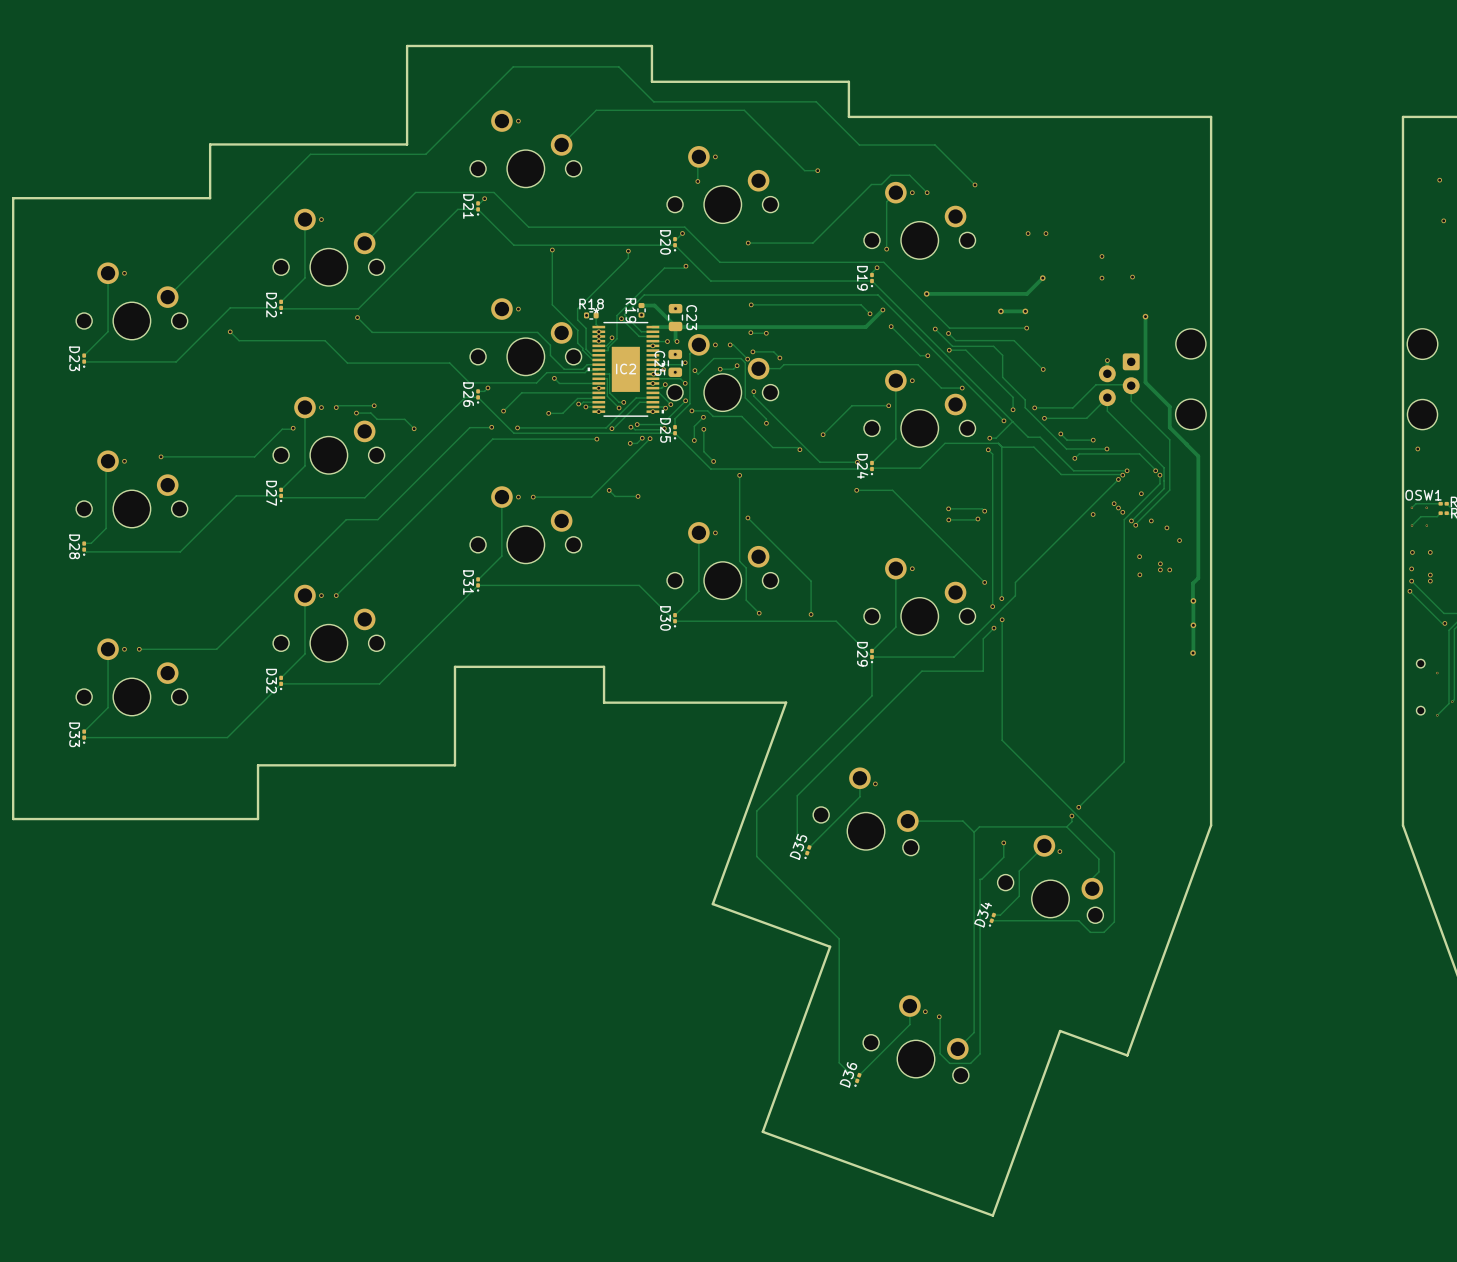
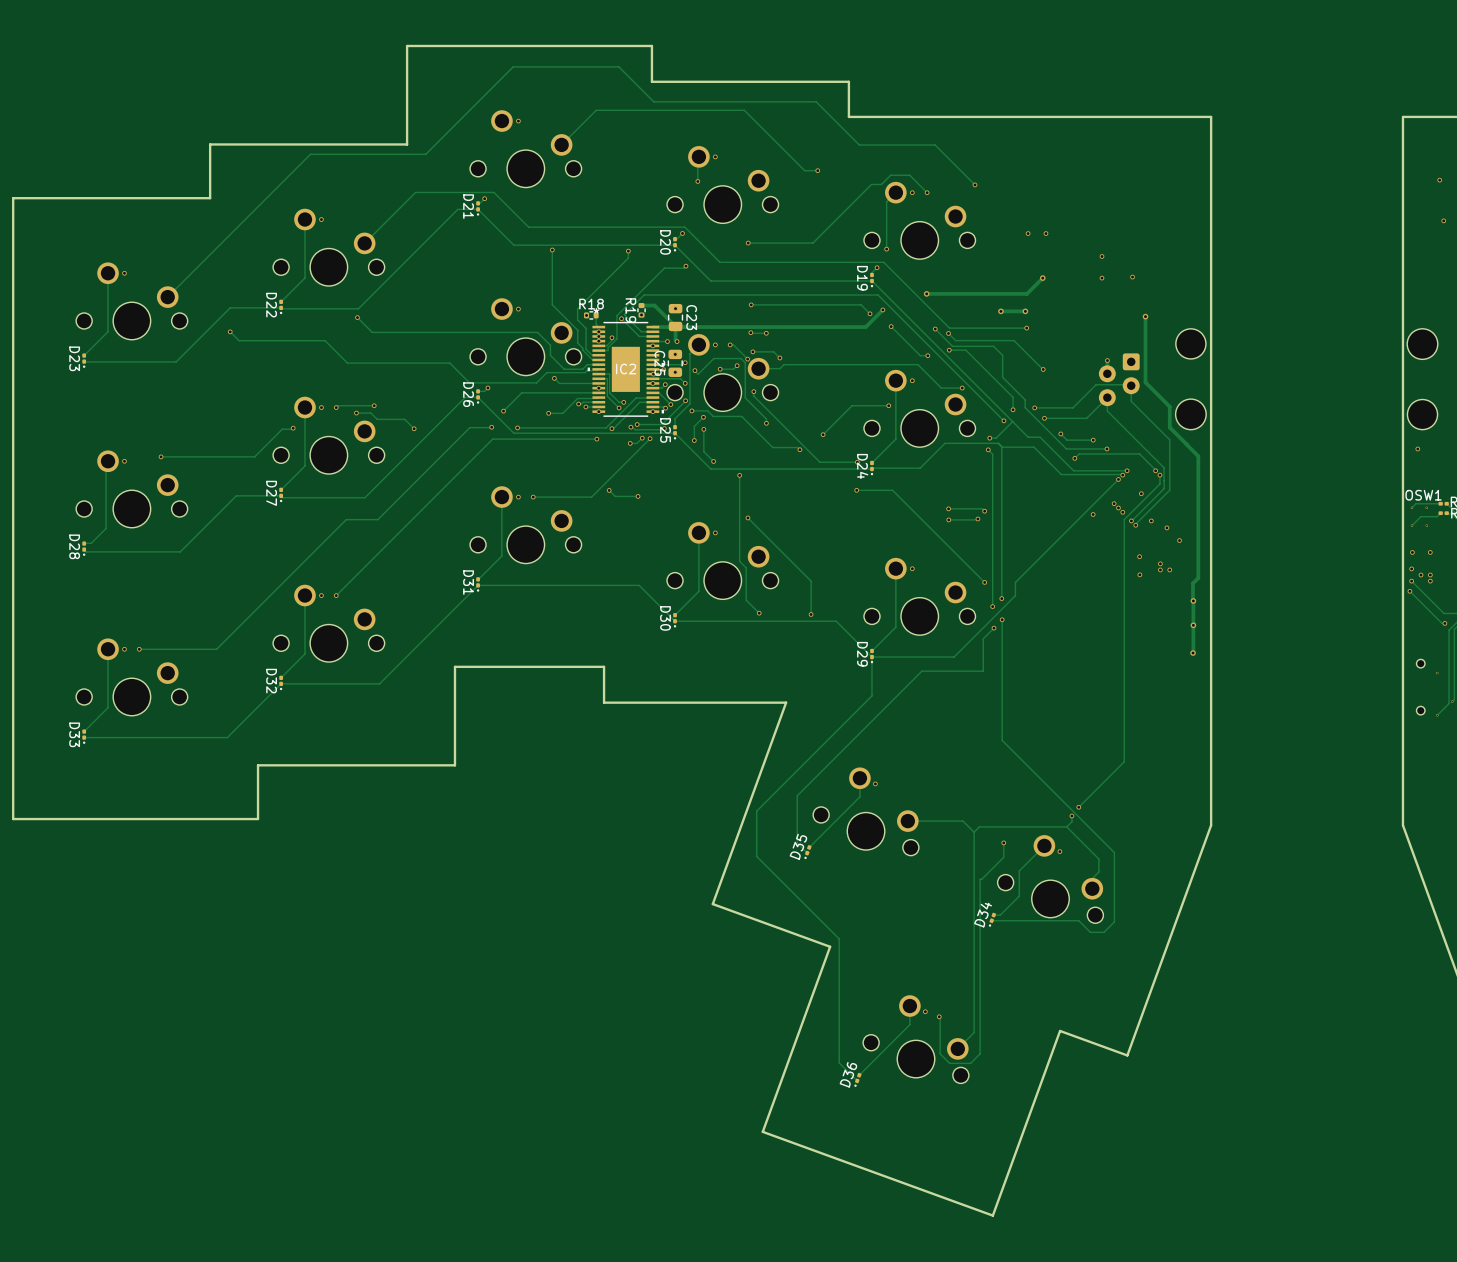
via: none -> (1420, 575)

